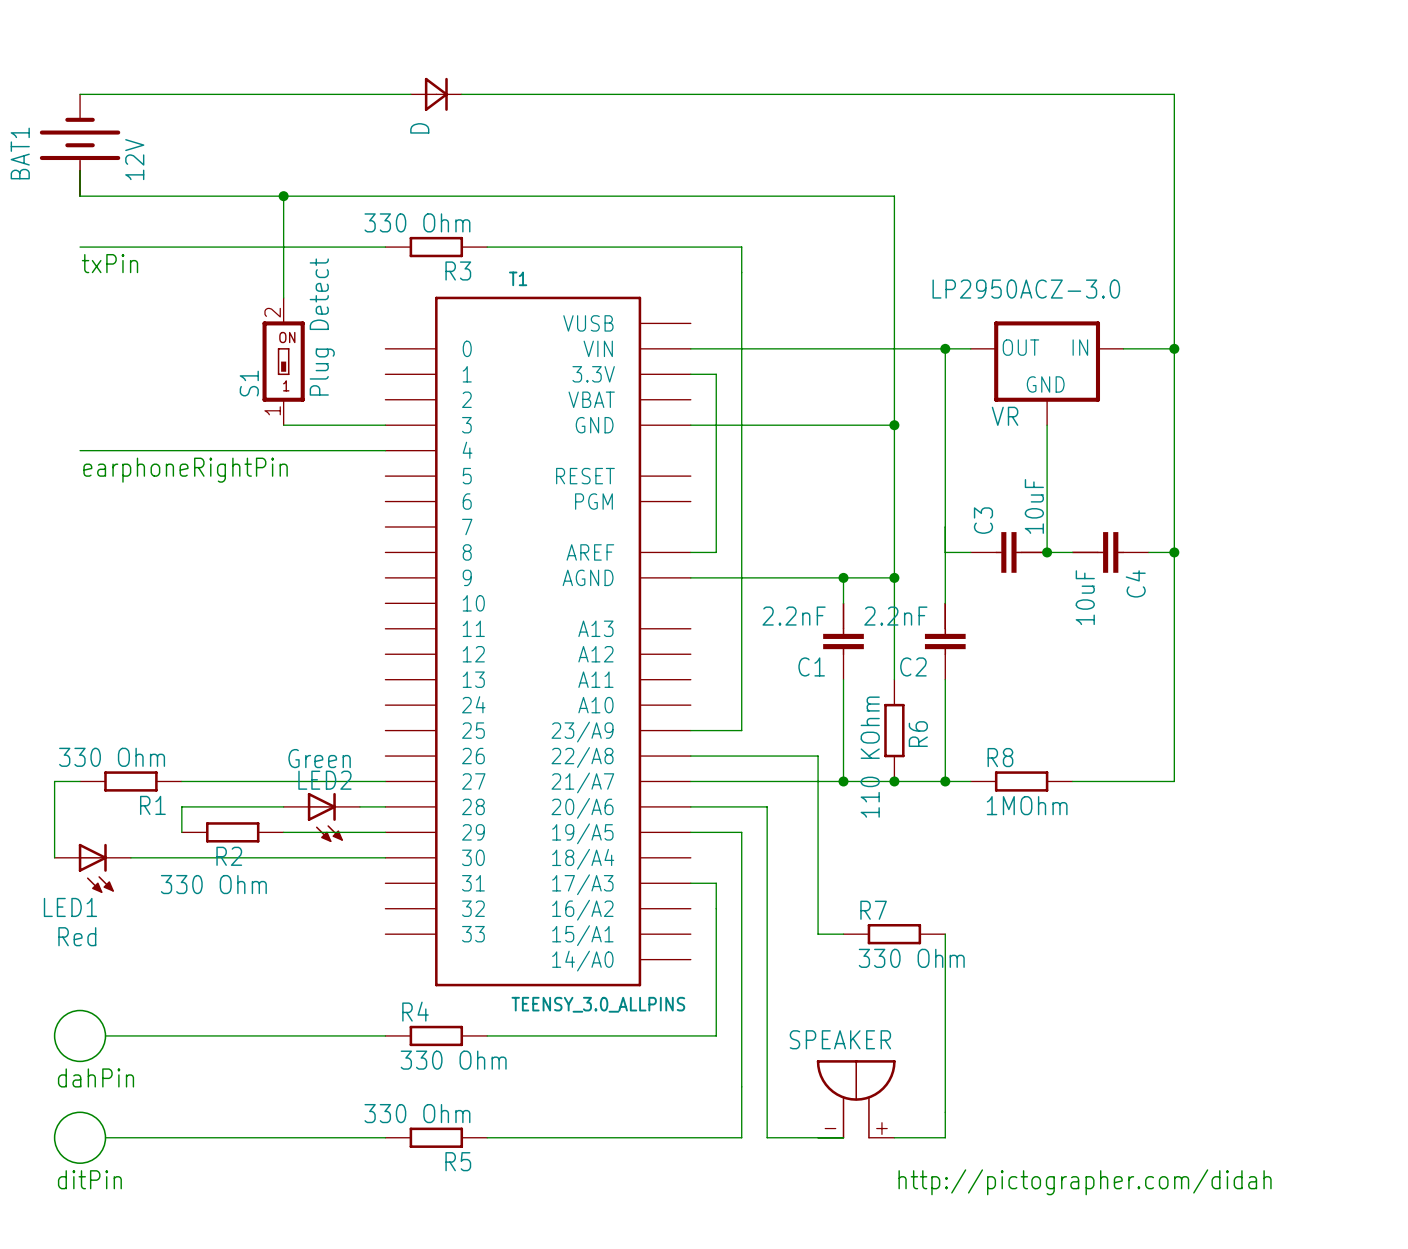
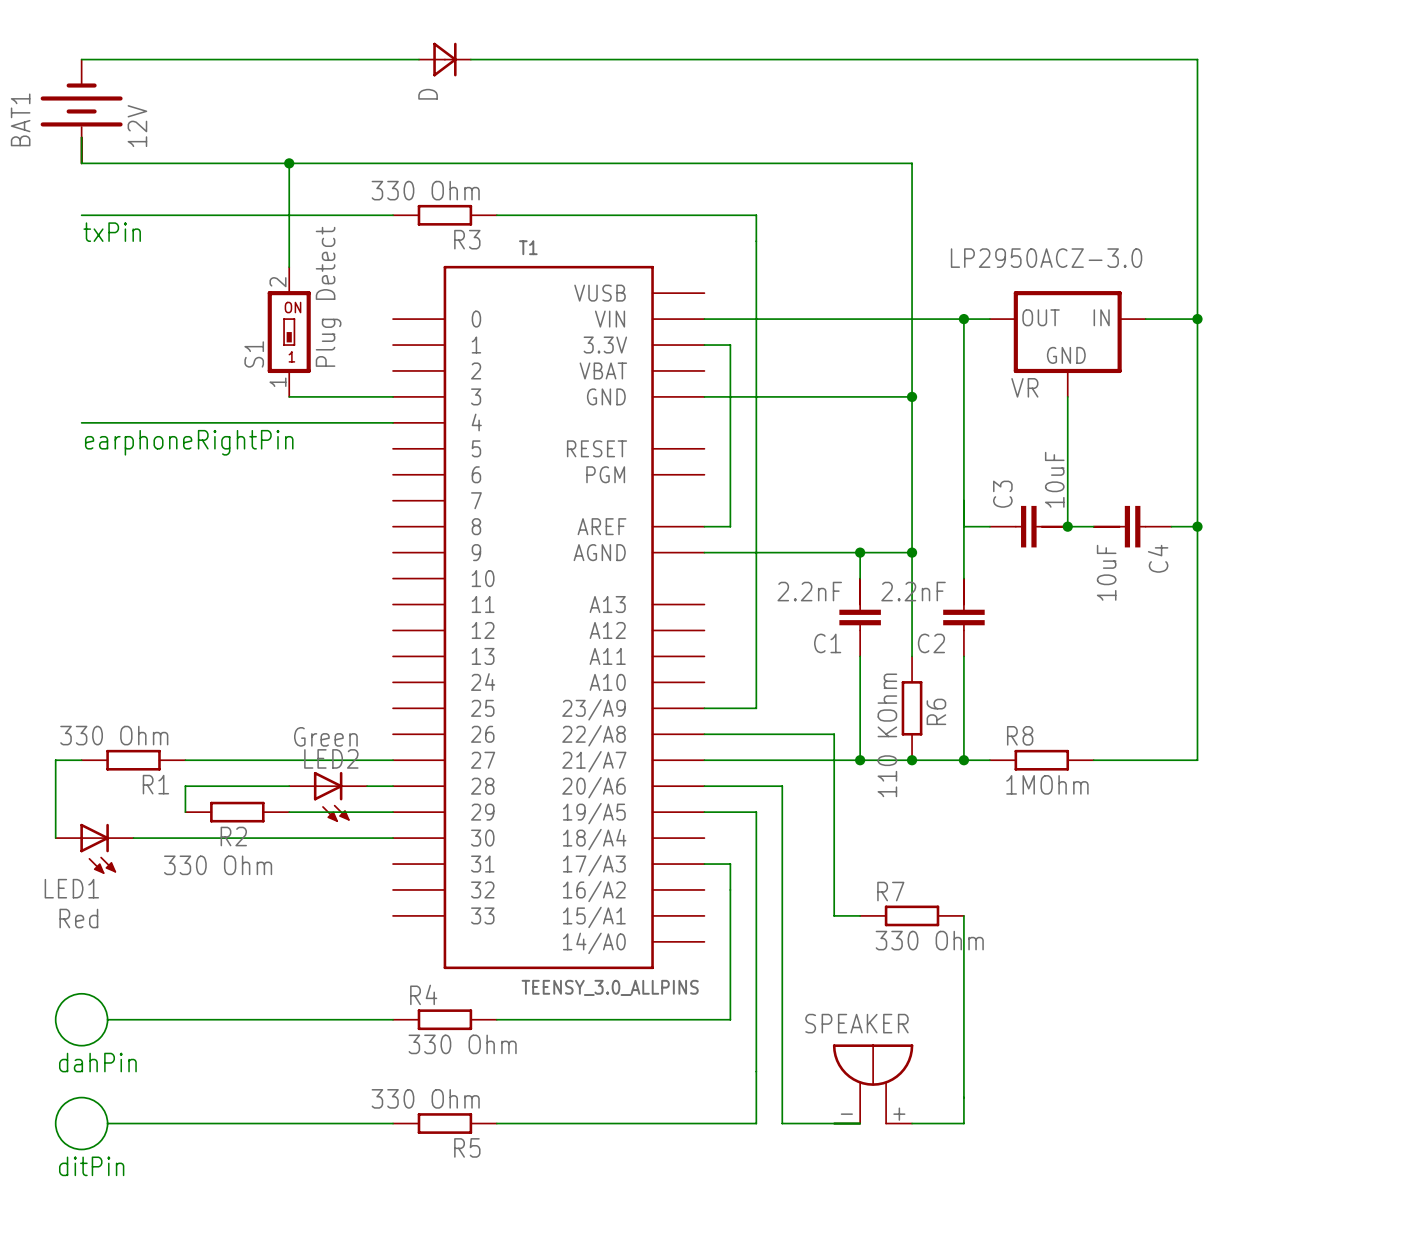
text: http://pictographer.com/didah (1085, 1182) -> none

